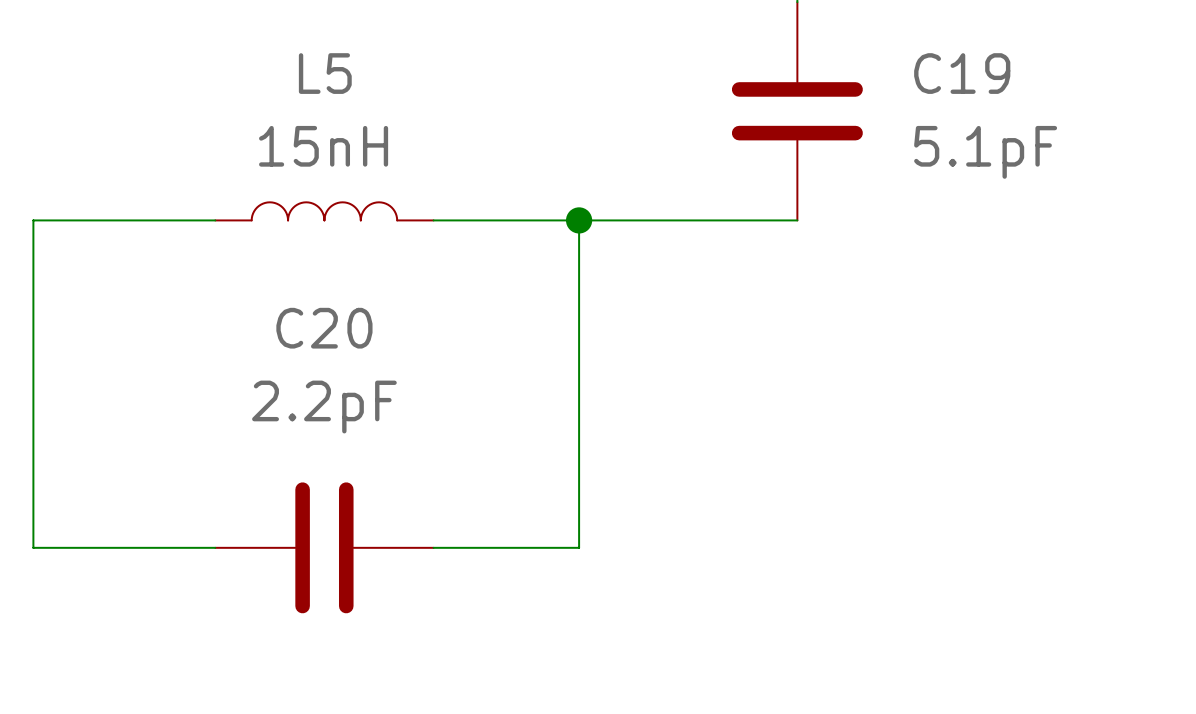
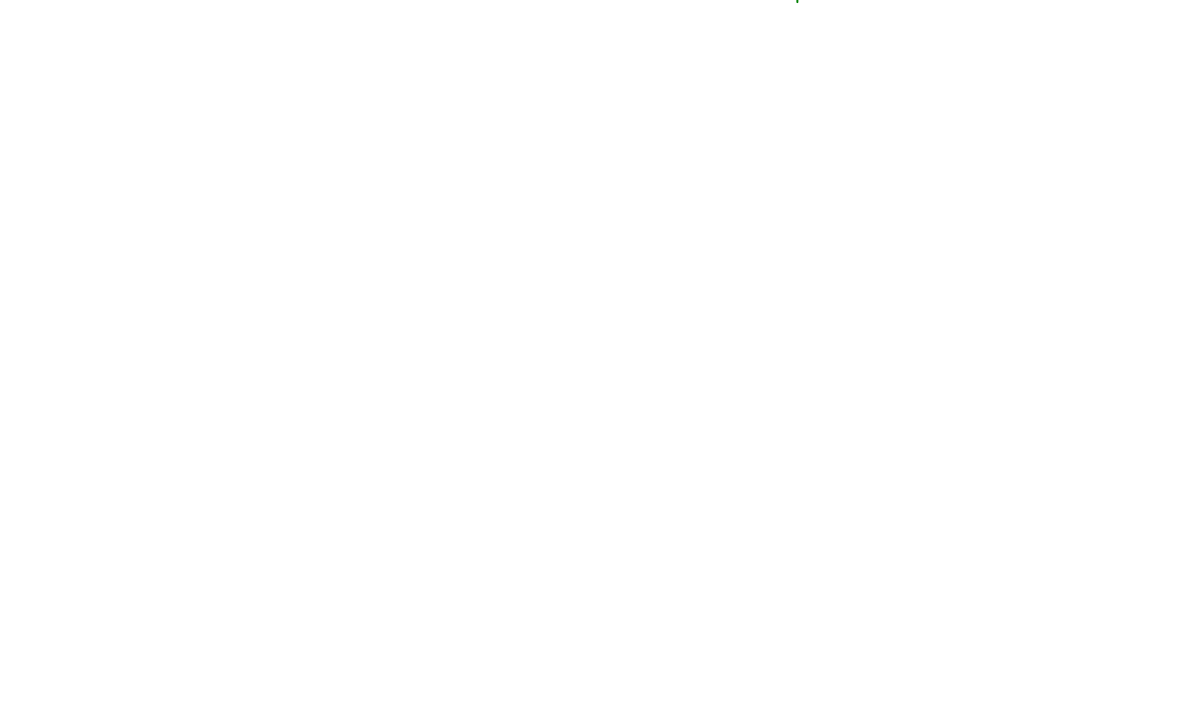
C19: 5.1pF (797, 111) -> none
L5: 15nH (324, 211) -> none
wire: (215, 220) (33, 220) (33, 547) (215, 547) -> none
wire: (433, 220) (797, 220) -> none
wire: (579, 220) (579, 547) (433, 547) -> none
junction: (579, 220) -> none
C20: 2.2pF (324, 547) -> none

